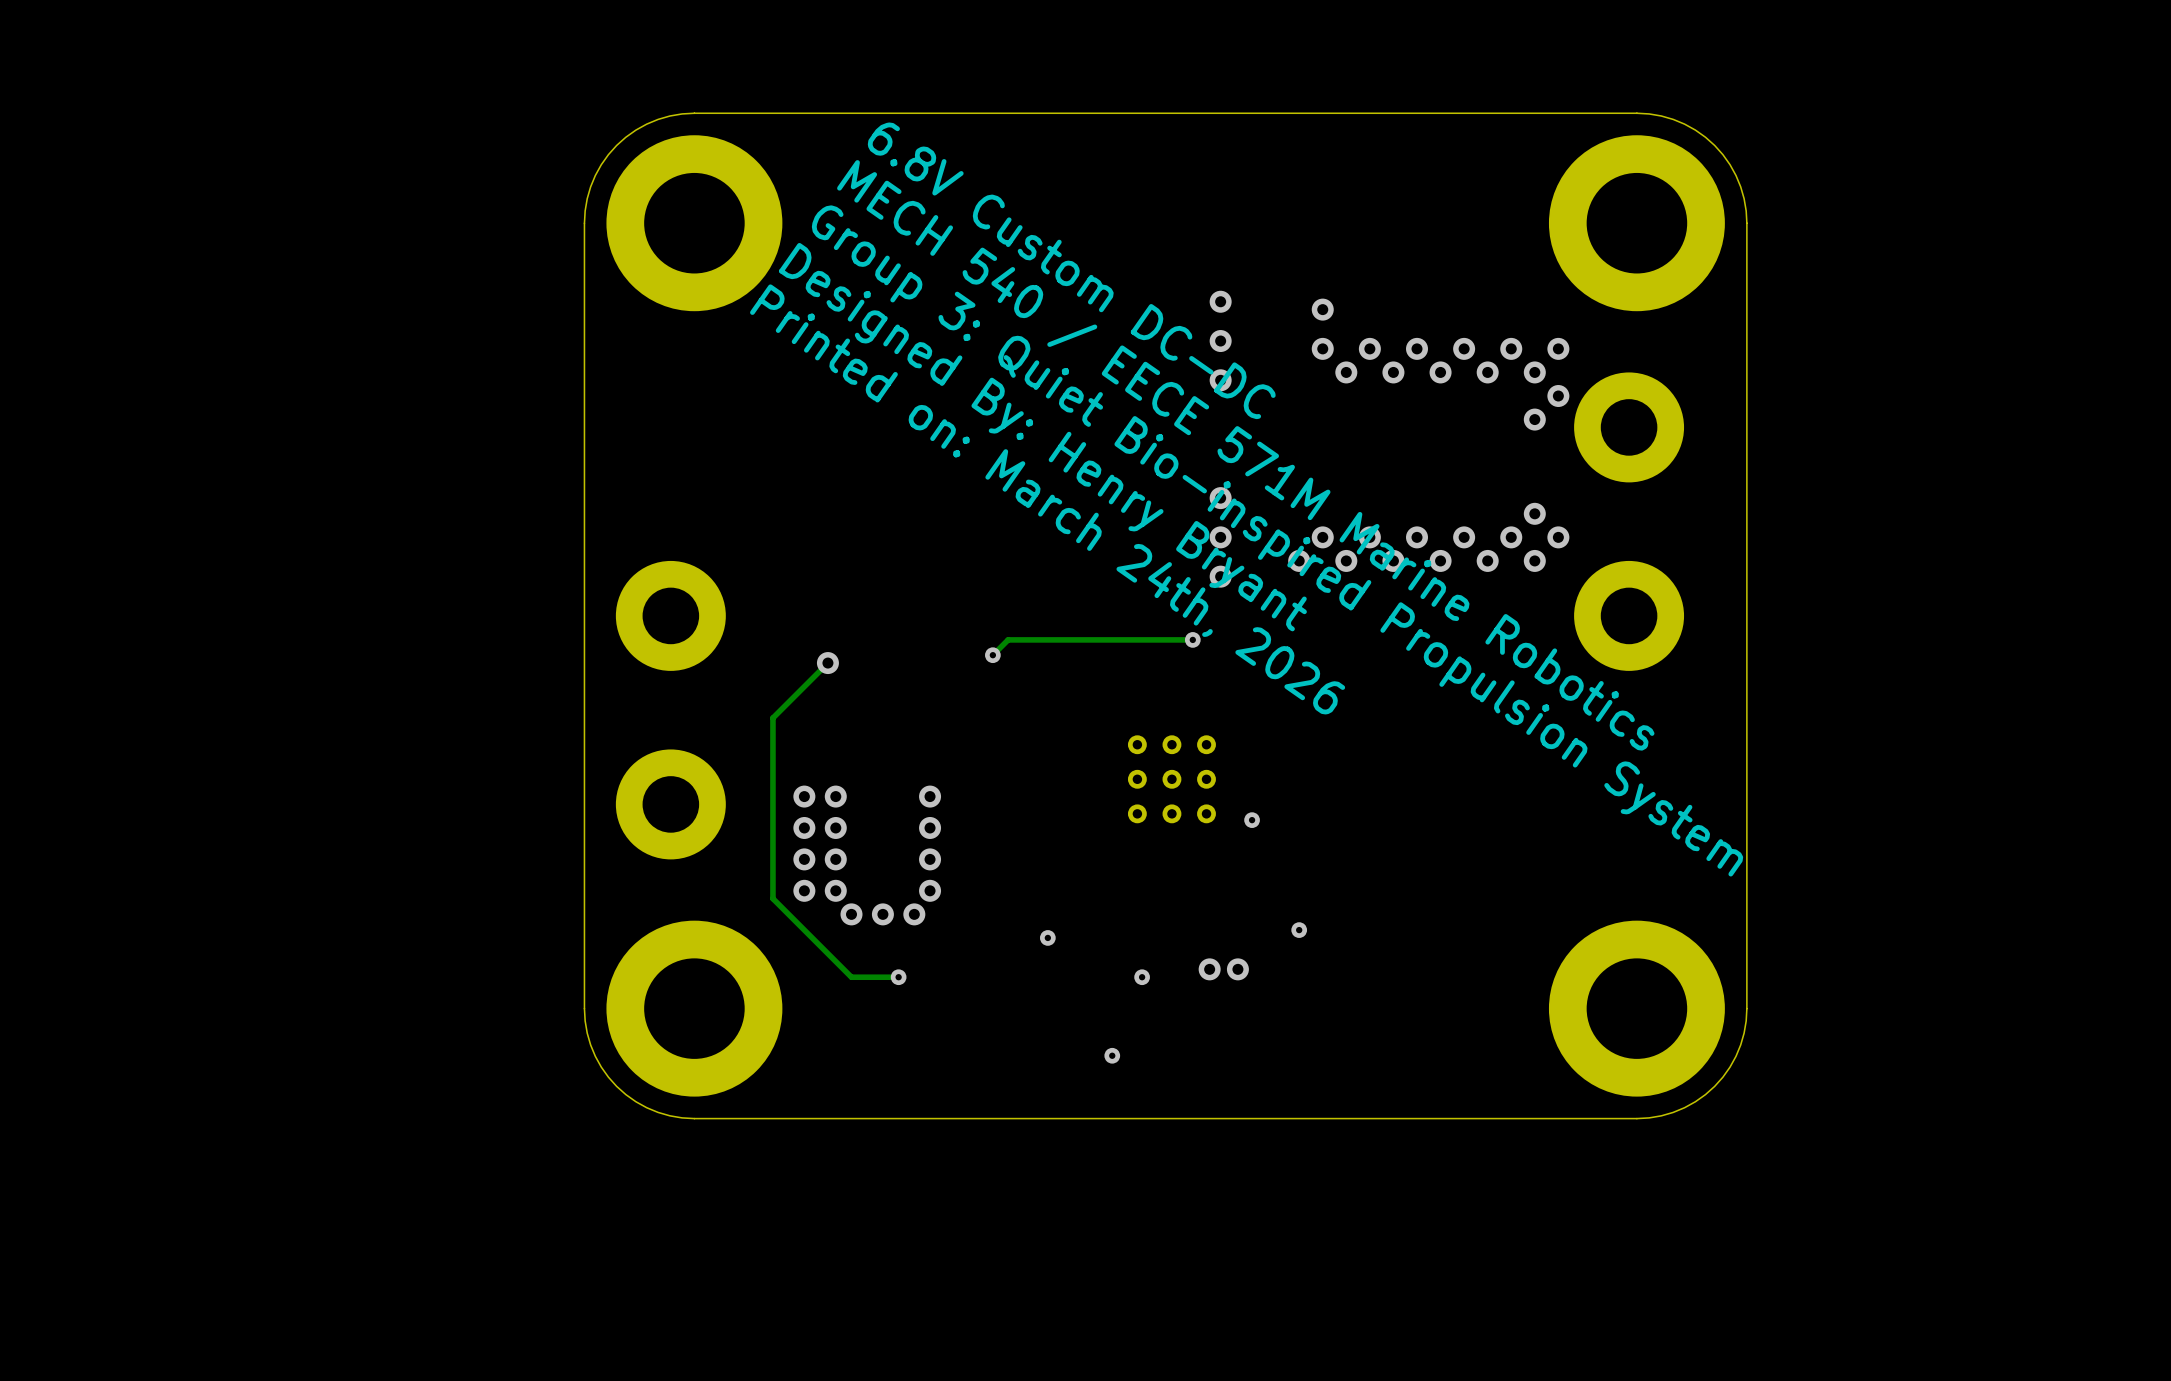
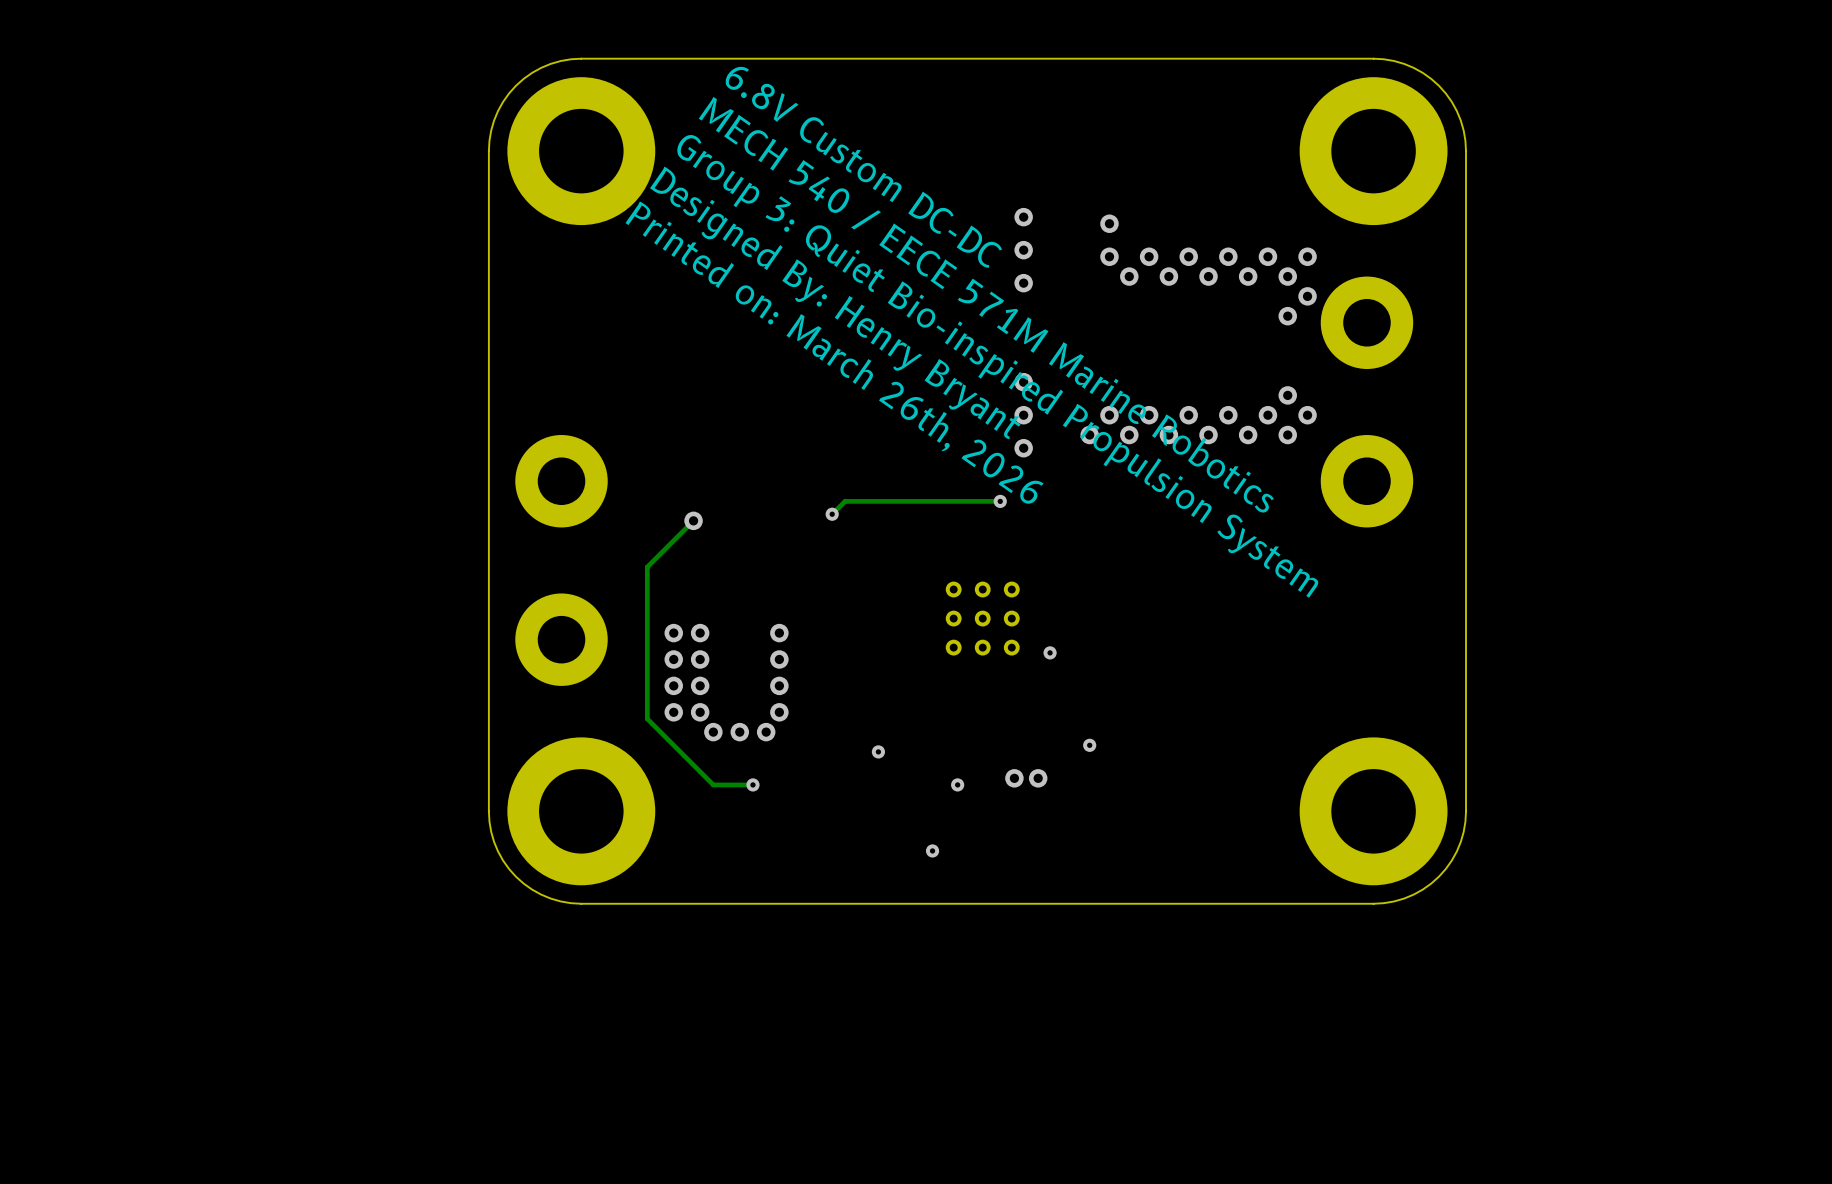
text: Printed on: March 24th, 2026 (1047, 499) -> Printed on: March 26th, 2026 (834, 352)

